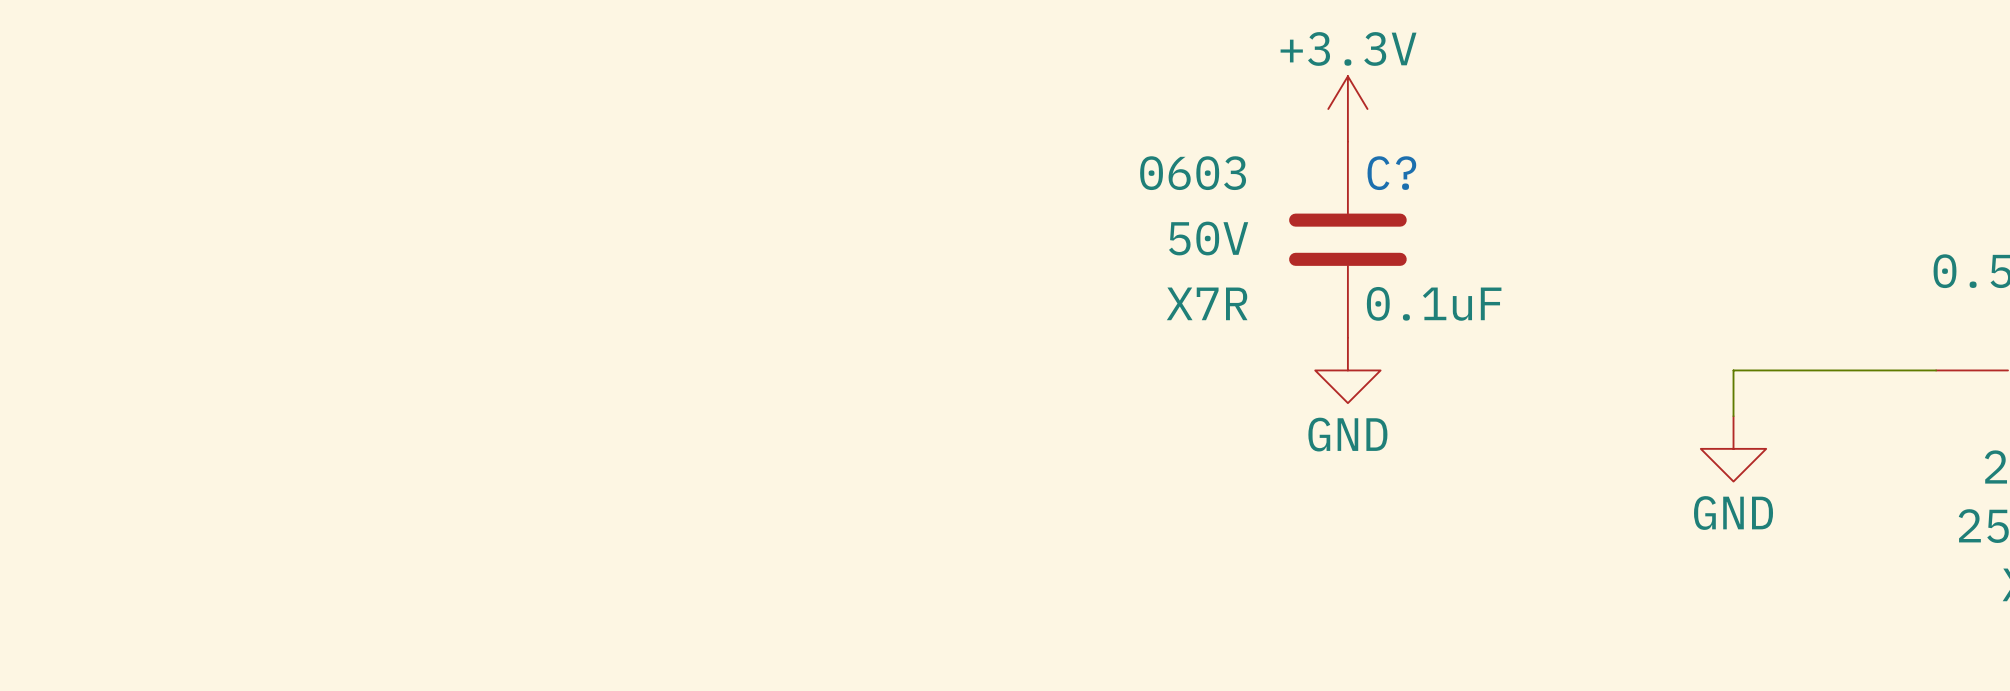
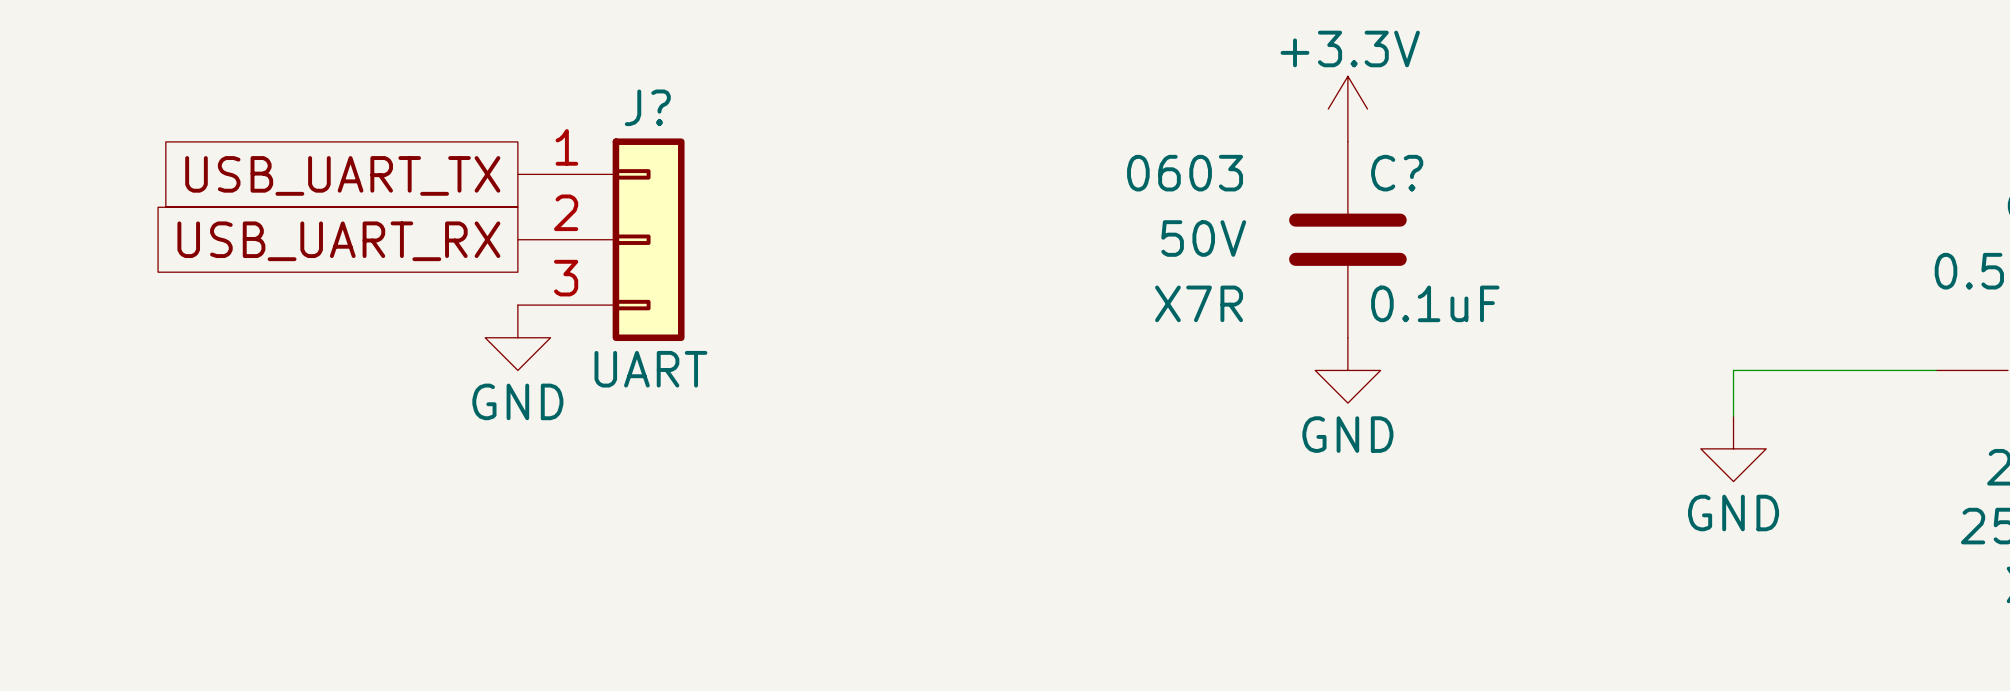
global label: none -> USB_UART_TX (342, 175)
J?: none -> UART (601, 239)
global label: none -> USB_UART_RX (338, 241)
power symbol: none -> GND (517, 337)

